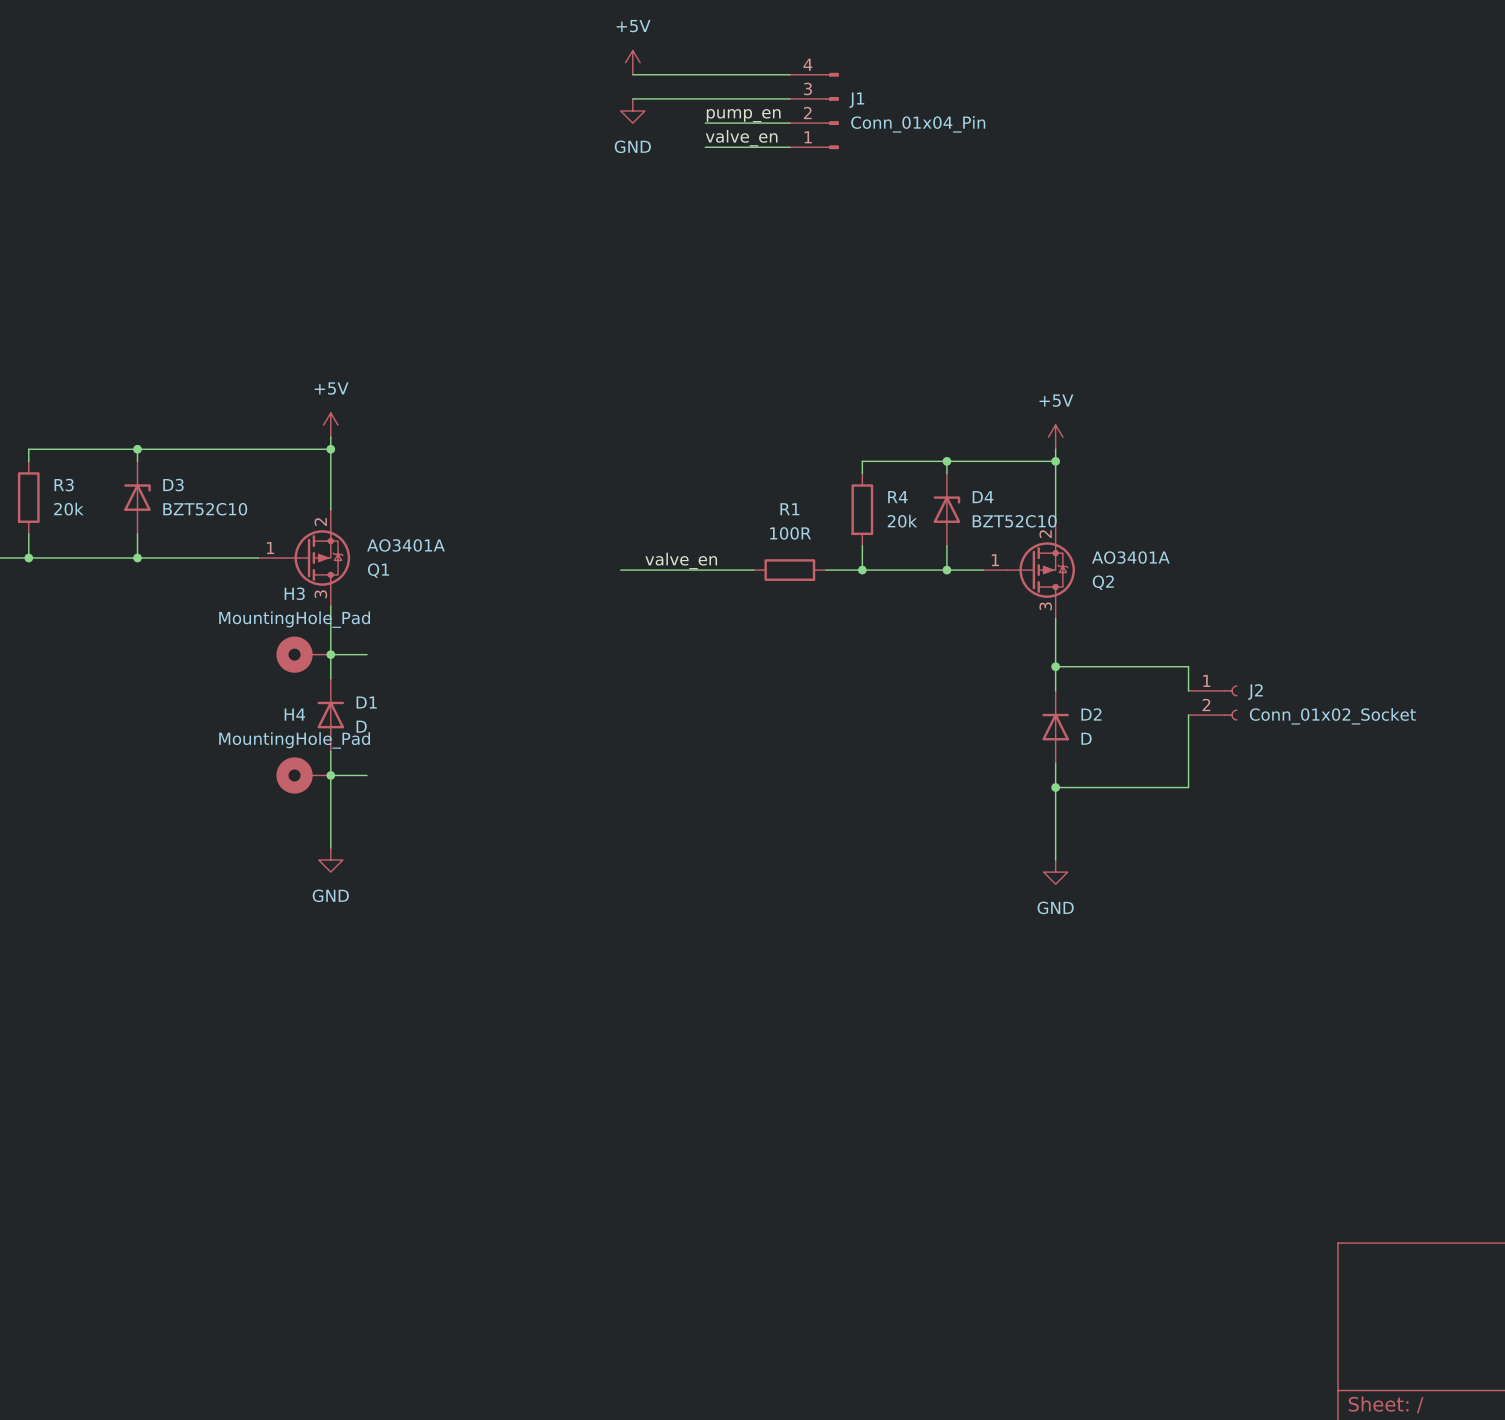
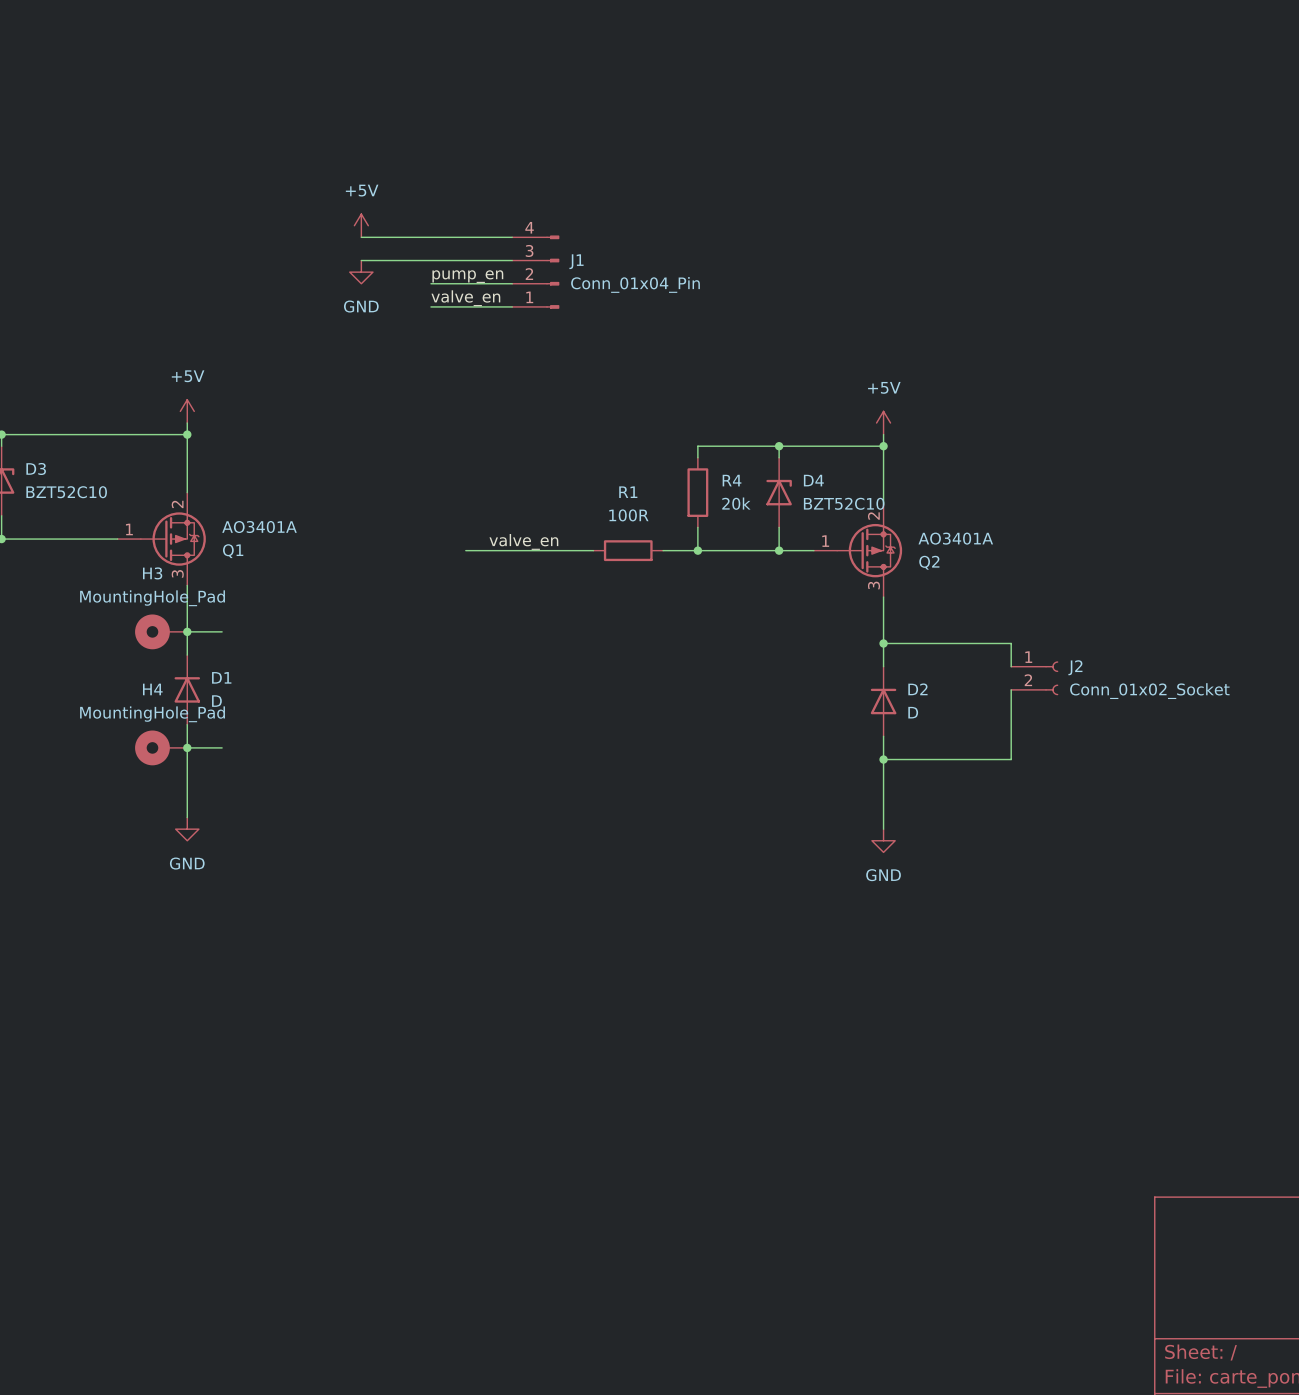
power symbol position: +5V (632, 62) -> +5V (361, 225)
wire: (632, 74) (789, 74) -> (361, 237) (512, 237)
wire: (632, 98) (789, 98) -> (361, 260) (512, 260)
power symbol position: GND (632, 111) -> GND (361, 272)
J1 position: (814, 111) -> (535, 272)
label position: pump_en (743, 115) -> pump_en (467, 276)
wire: (705, 123) (789, 123) -> (430, 283) (512, 283)
label position: valve_en (741, 138) -> valve_en (465, 298)
wire: (705, 147) (789, 147) -> (430, 306) (512, 306)

